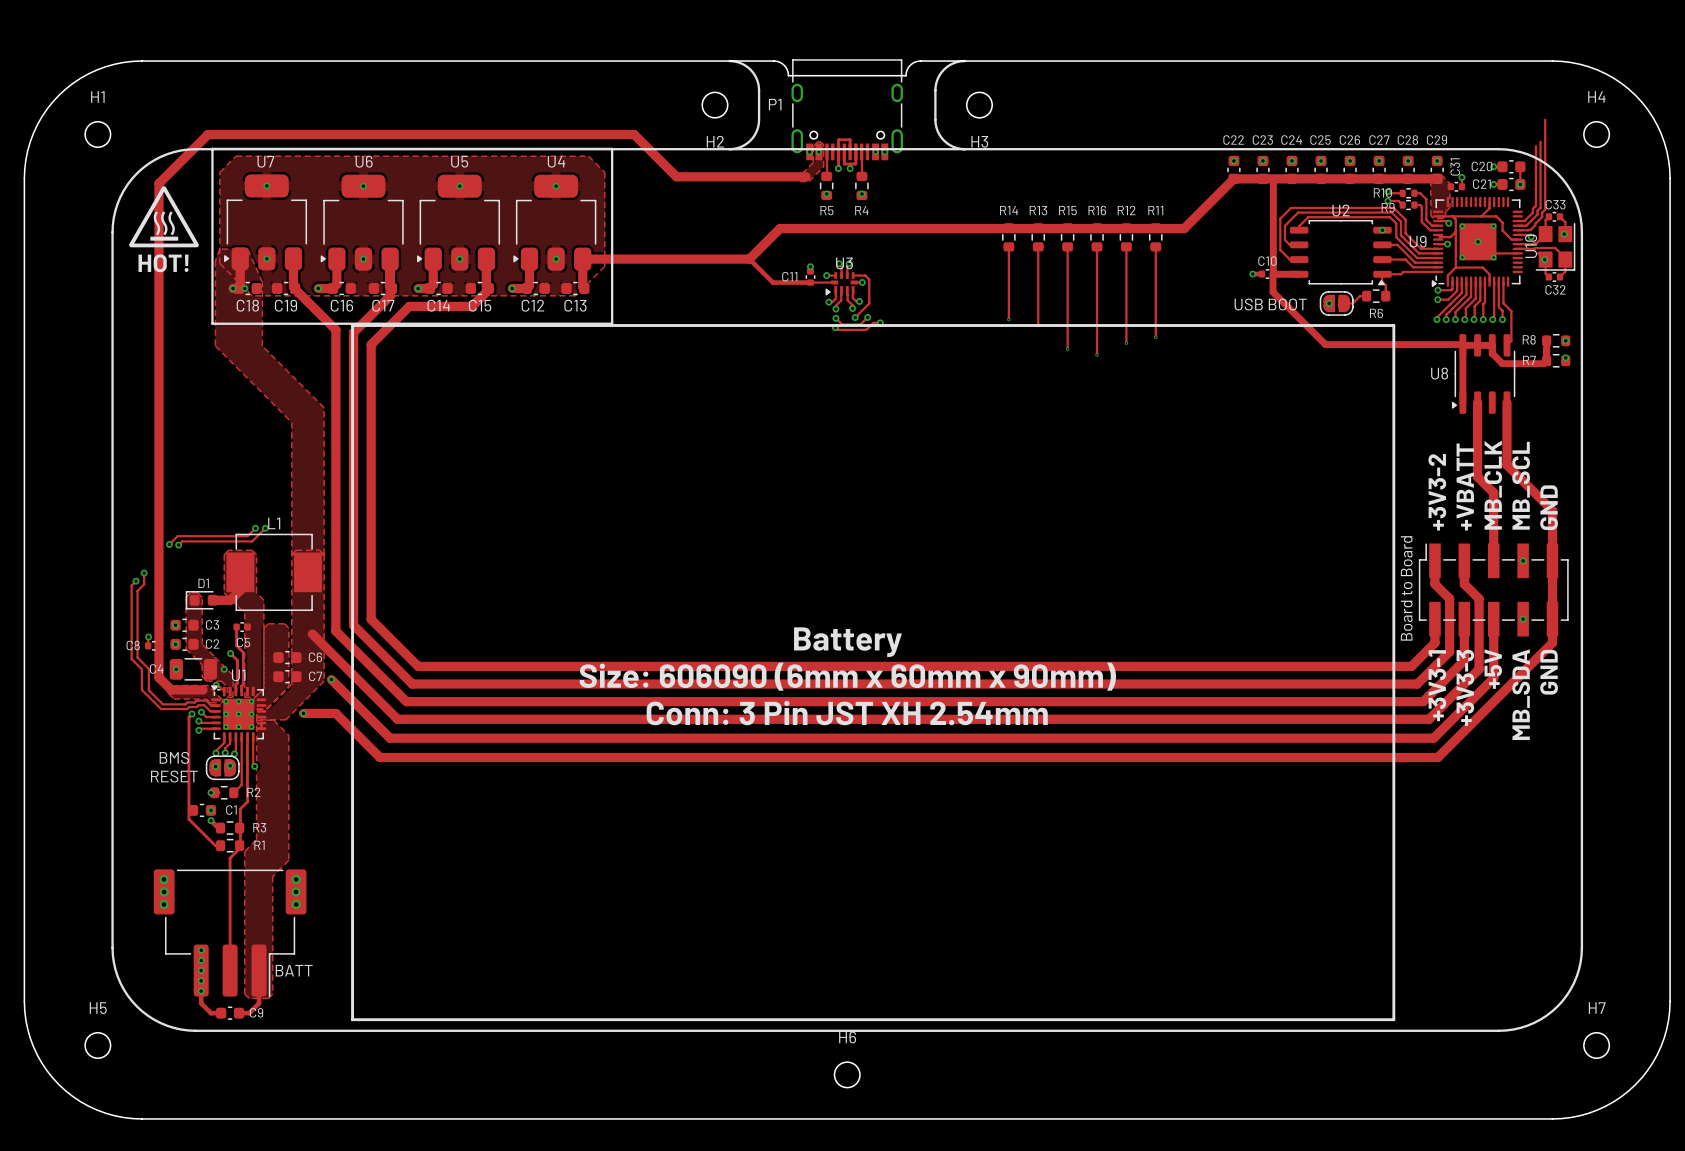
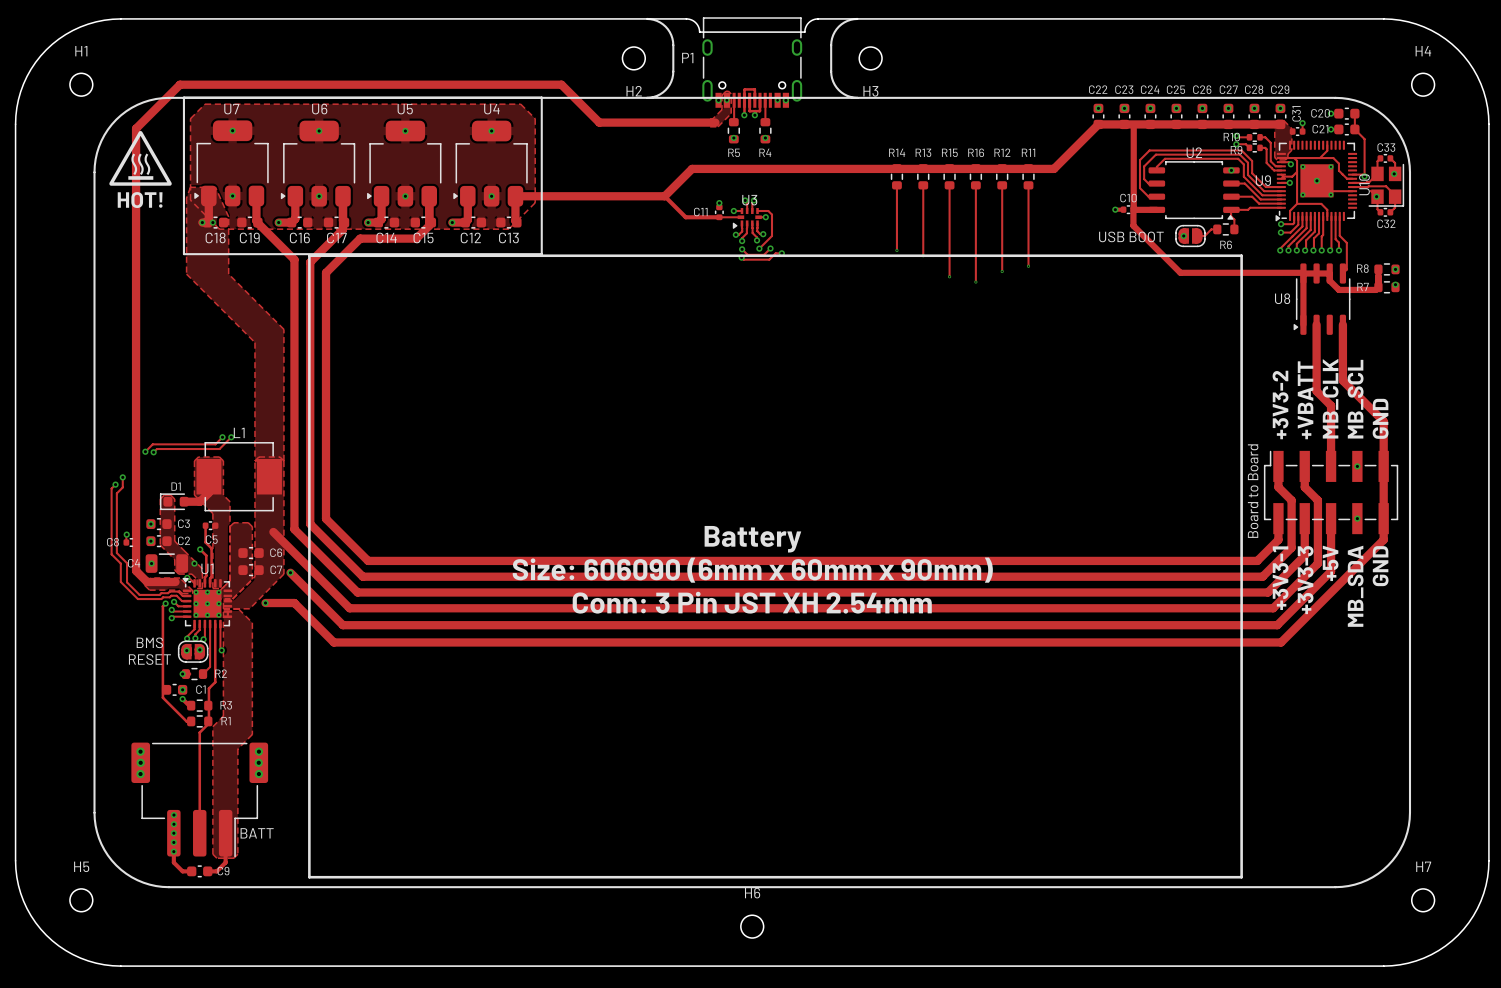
track: (1545, 119) (1545, 209) -> none
track: (1540, 141) (1540, 207) (1537, 210) (1537, 214) (1526, 225) (1517, 225) -> none
track: (1535, 146) (1535, 205) (1532, 208) (1532, 212) (1524, 221) (1517, 221) -> none
track: none -> (1354, 129) (1364, 139) (1364, 176)
via: (1520, 184) -> none
track: (1545, 209) (1542, 212) (1542, 216) (1530, 229) (1517, 230) -> none

